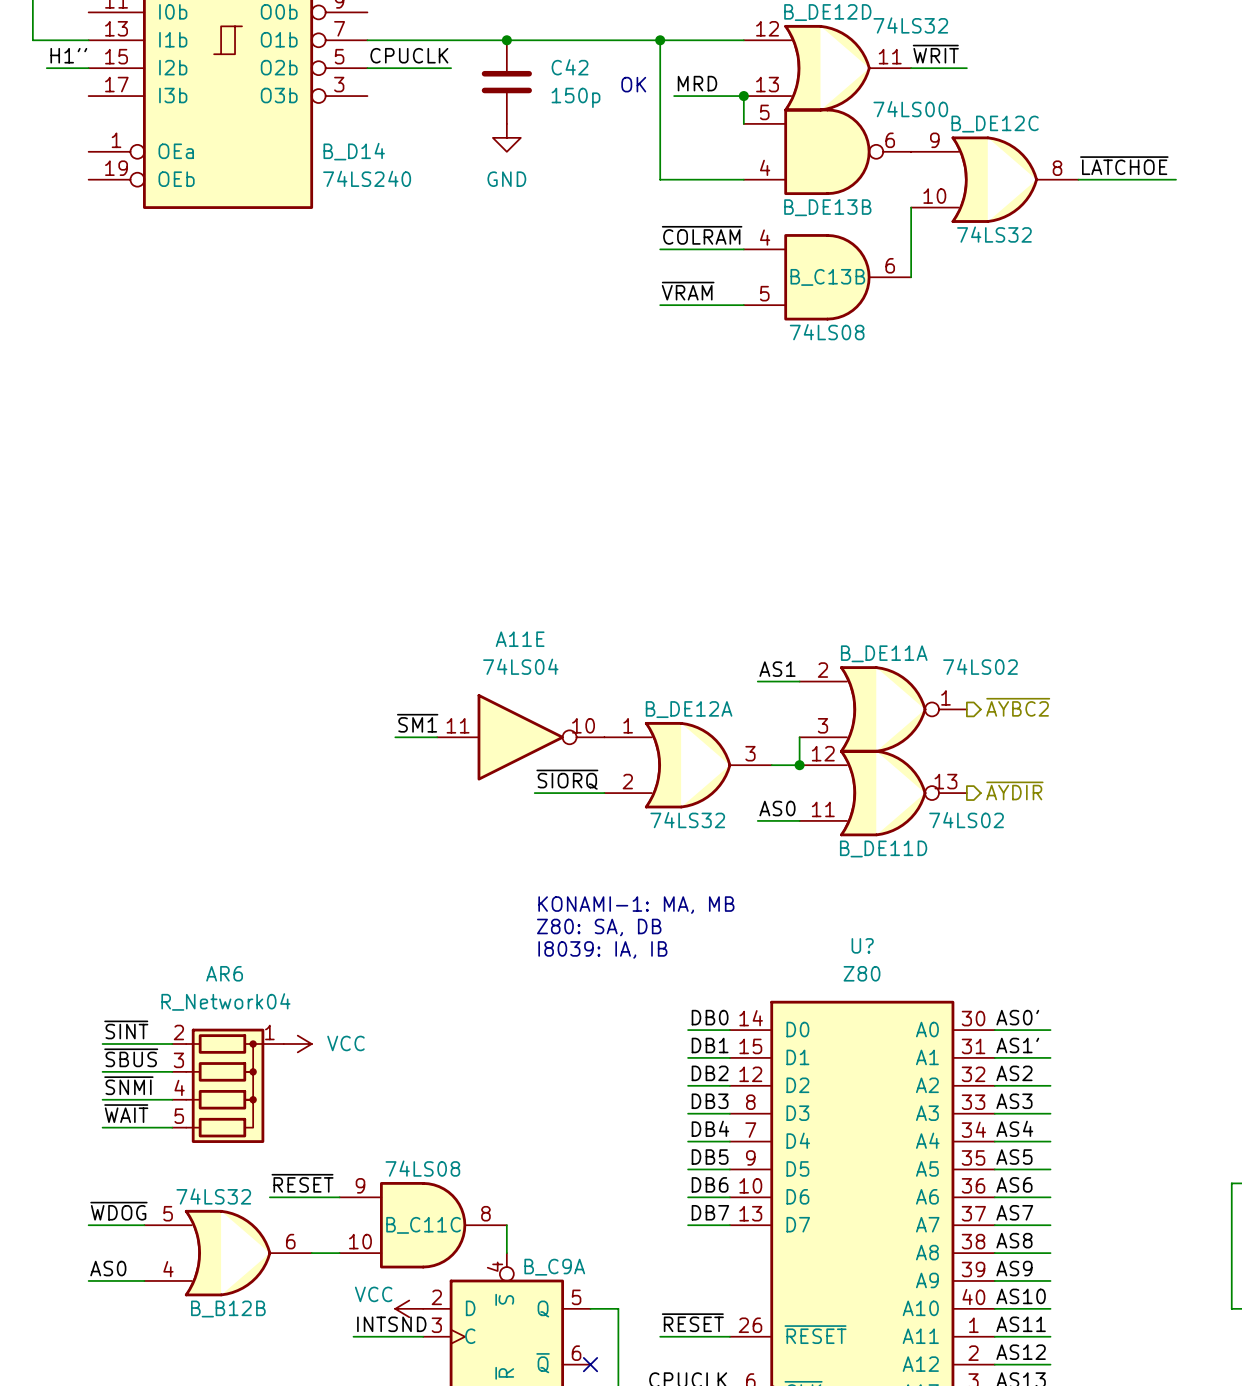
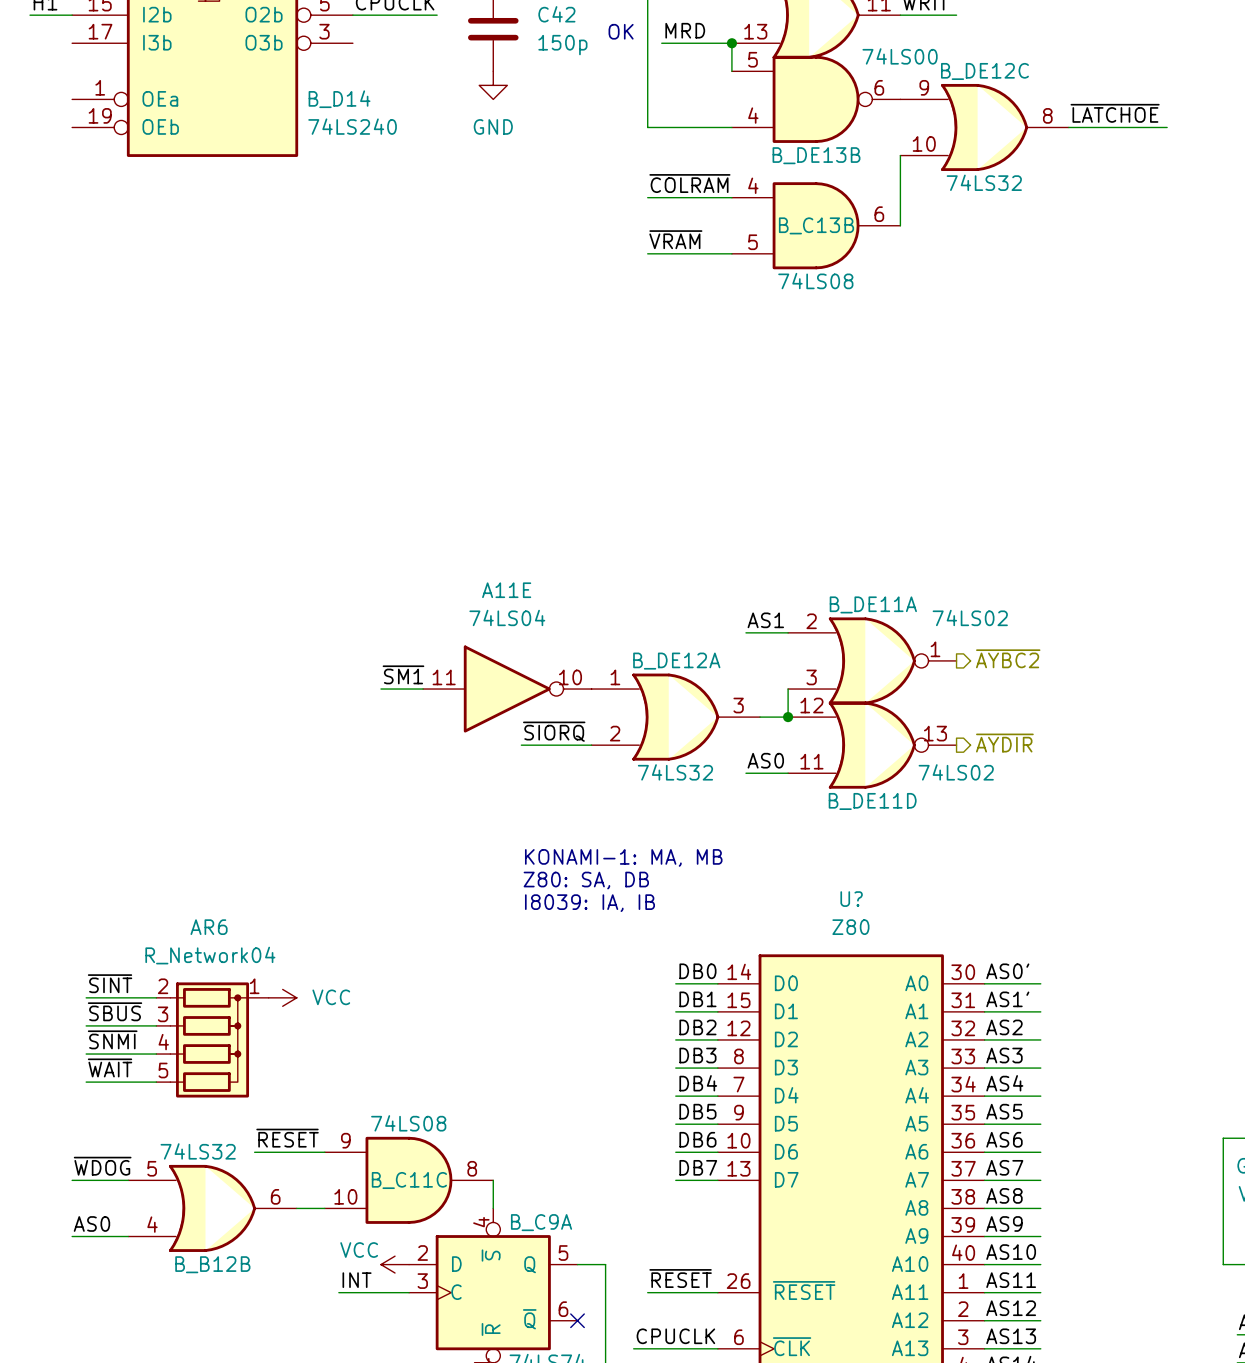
label: INTSND (391, 1324) -> INT (357, 1280)

